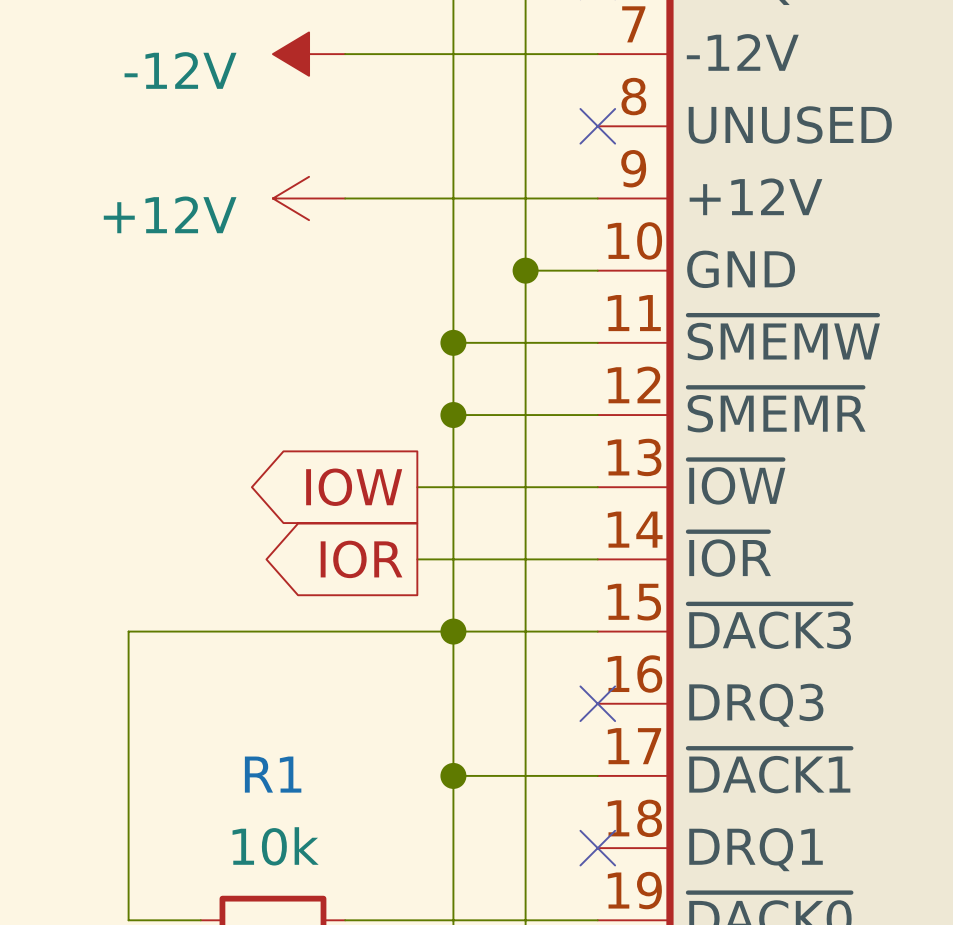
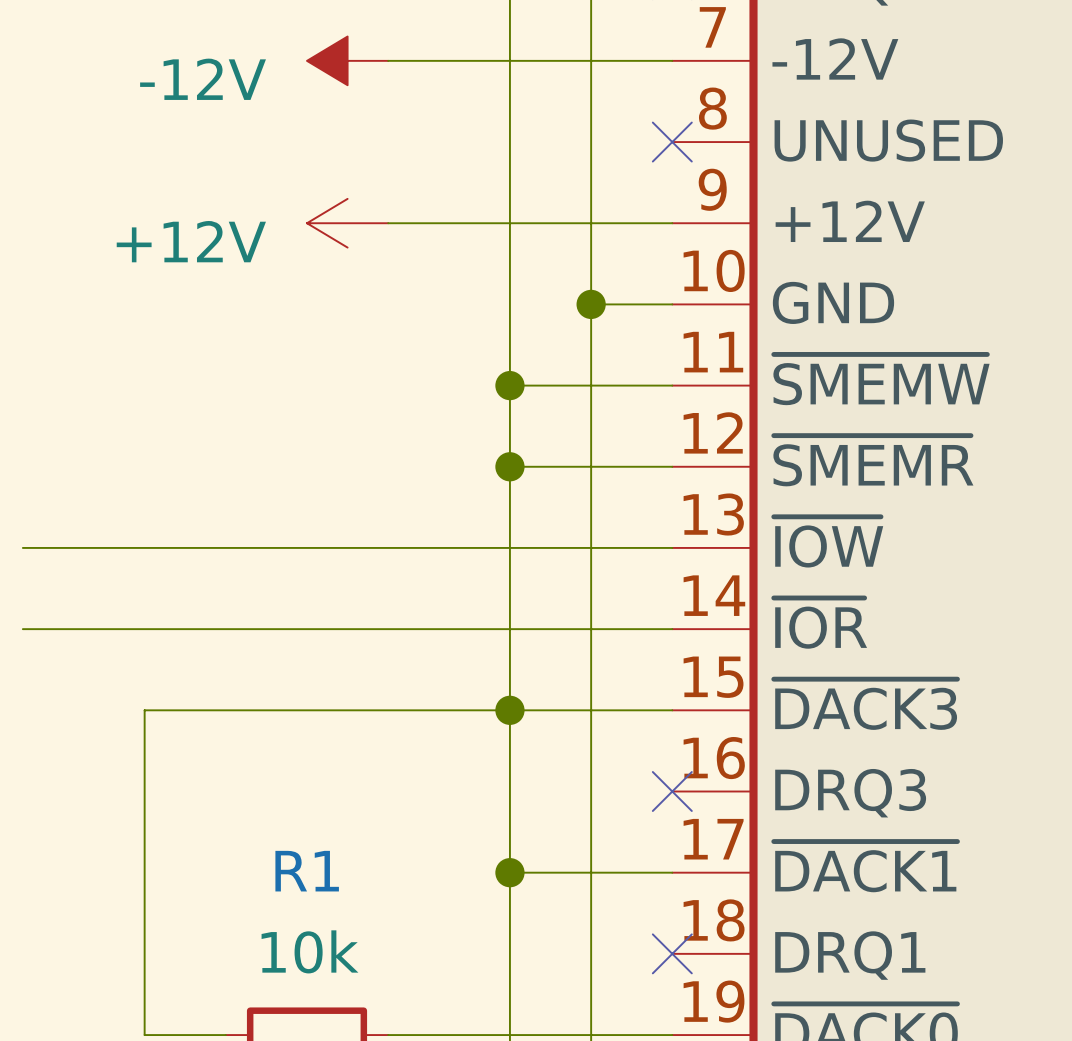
wire: none -> (22, 547) (469, 547)
global label: IOW (354, 487) -> none
wire: none -> (22, 629) (469, 629)
global label: IOR (361, 559) -> none

